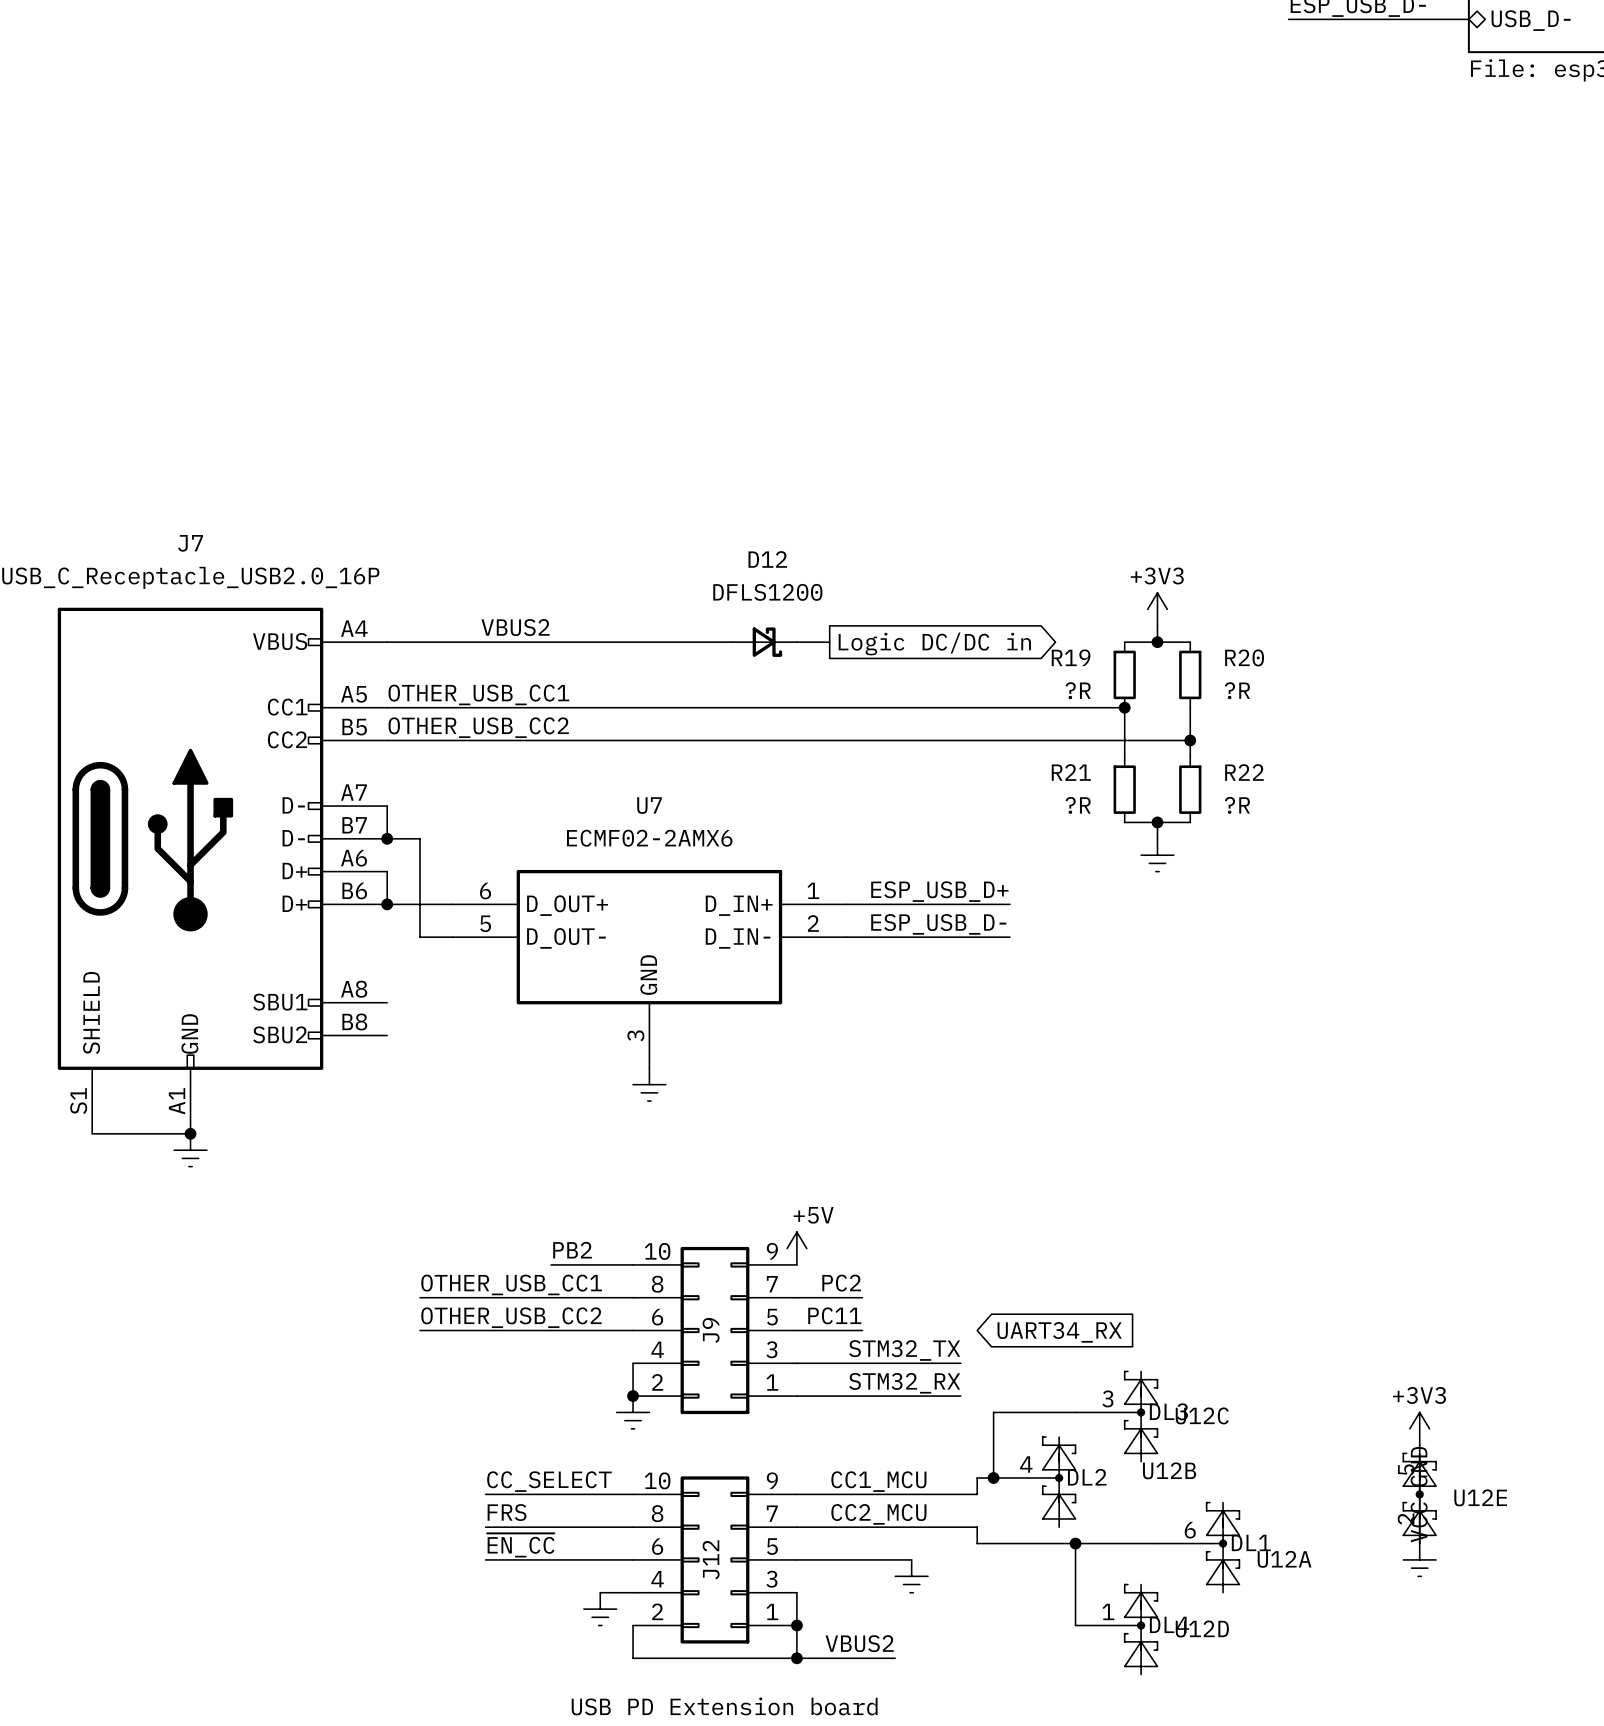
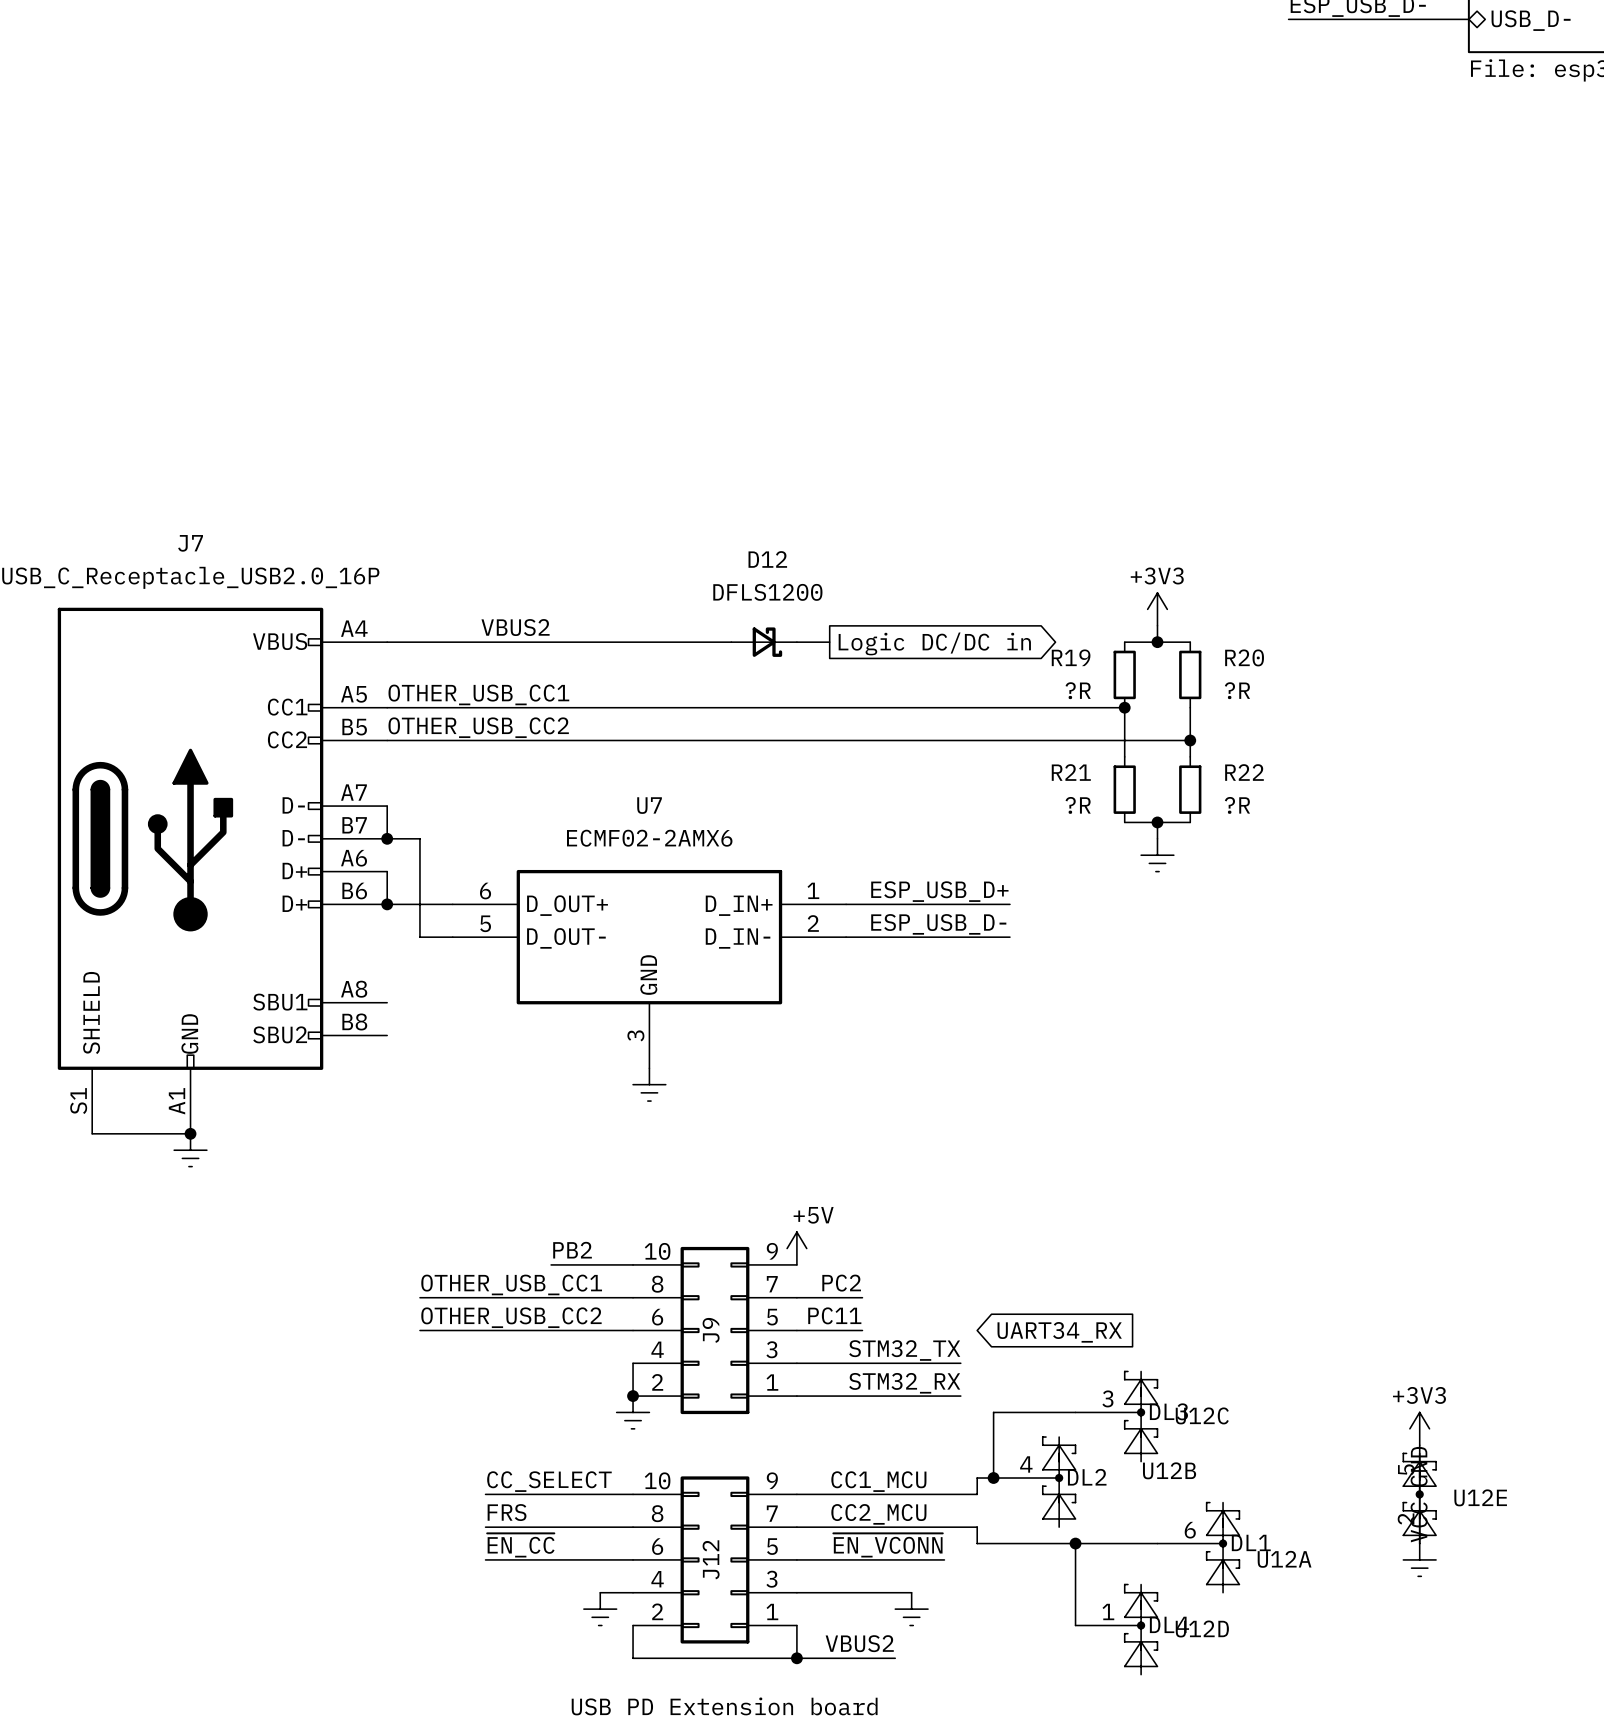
label: none -> ~{EN_VCONN} (888, 1545)
wire: none -> (911, 1559) (944, 1559)
power symbol position: (911, 1576) -> (911, 1609)
wire: (796, 1592) (796, 1625) -> (796, 1592) (911, 1592)
junction: (796, 1625) -> none

